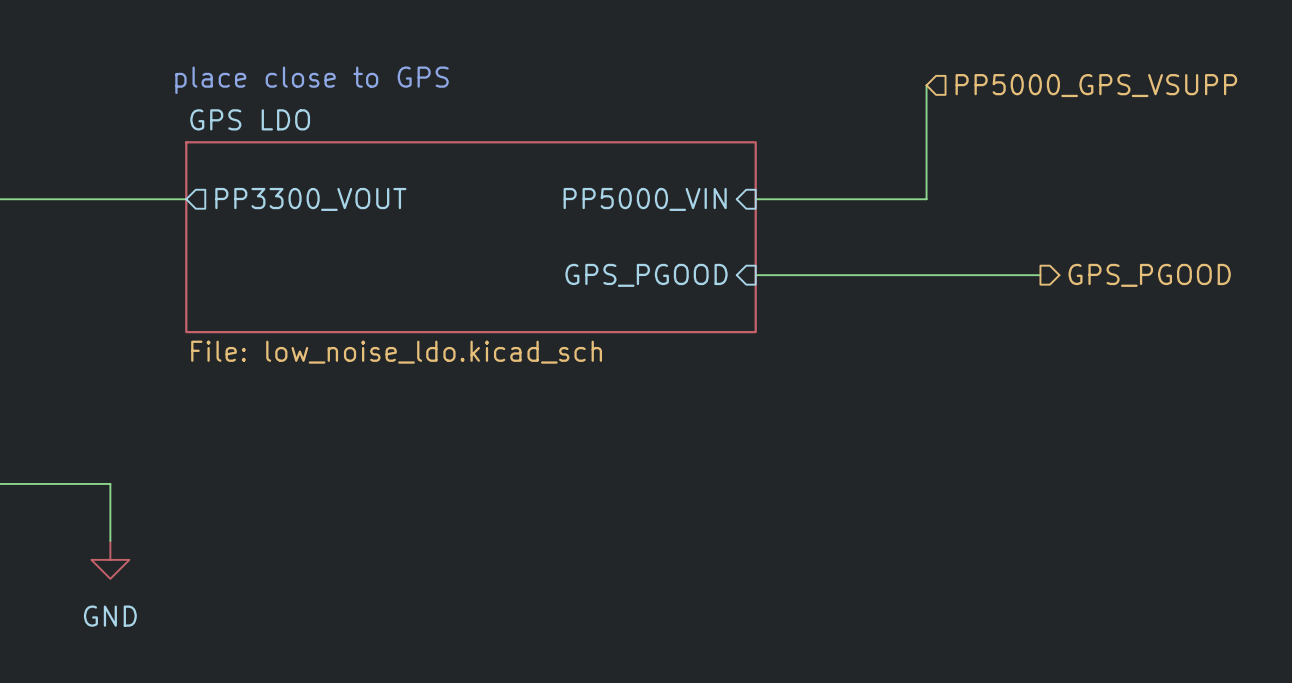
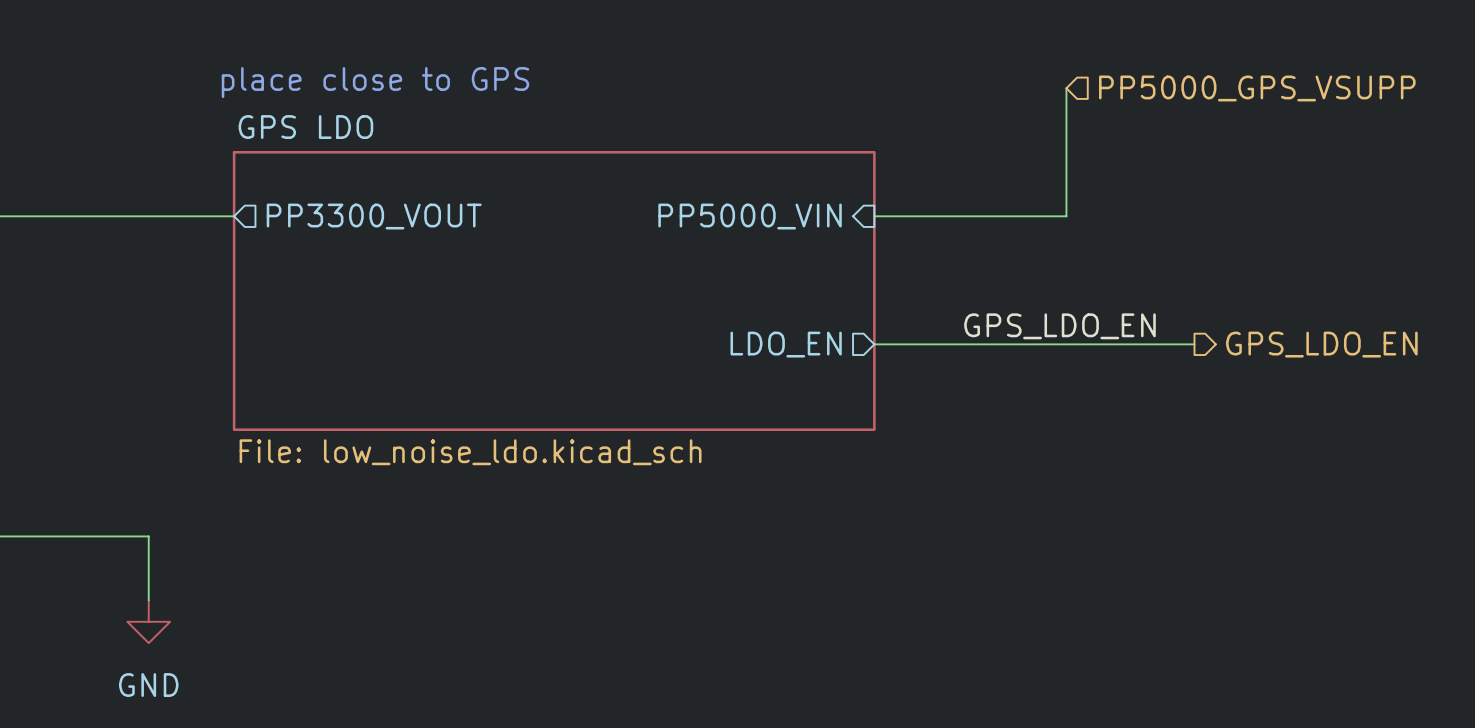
sheet GPS LDO: File: low_noise_ldo.kicad_sch (471, 237) -> none
sheet GPS LDO: none -> File: low_noise_ldo.kicad_sch (554, 291)
sheet pin: GPS_PGOOD (646, 275) -> none
wire: (755, 275) (1040, 275) -> (874, 344) (1194, 344)
hierarchical label: GPS_PGOOD (1149, 275) -> none
label: none -> GPS_LDO_EN (1059, 326)
sheet pin: none -> LDO_EN (786, 344)
hierarchical label: none -> GPS_LDO_EN (1321, 344)

